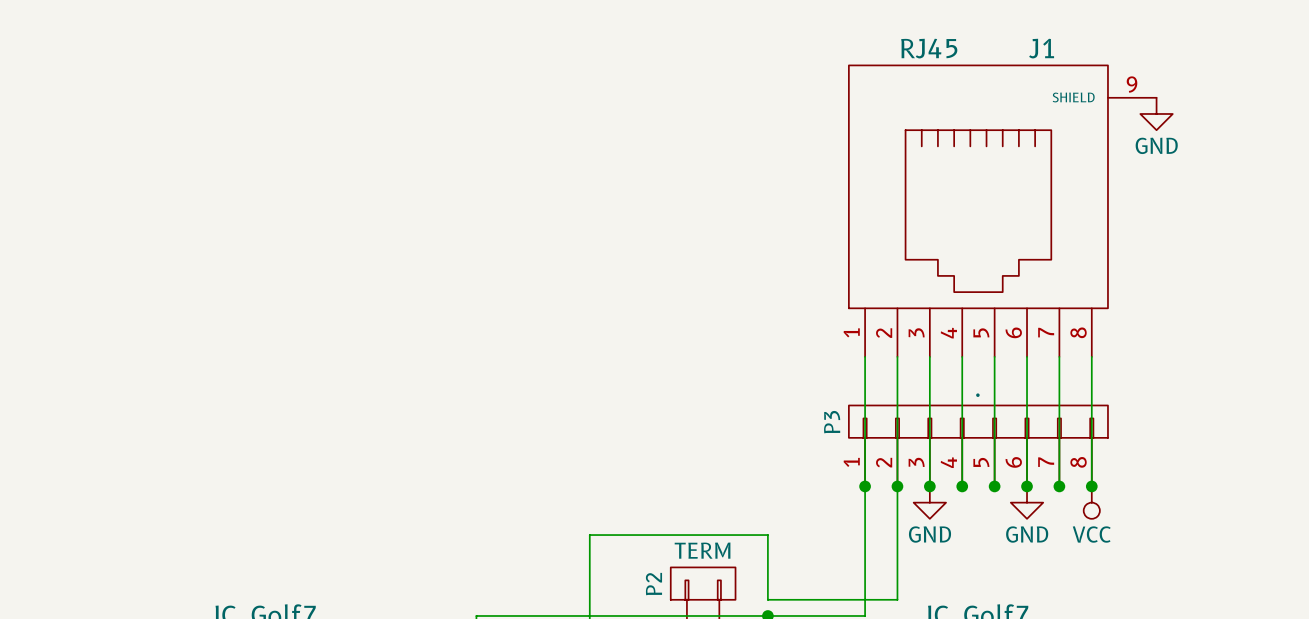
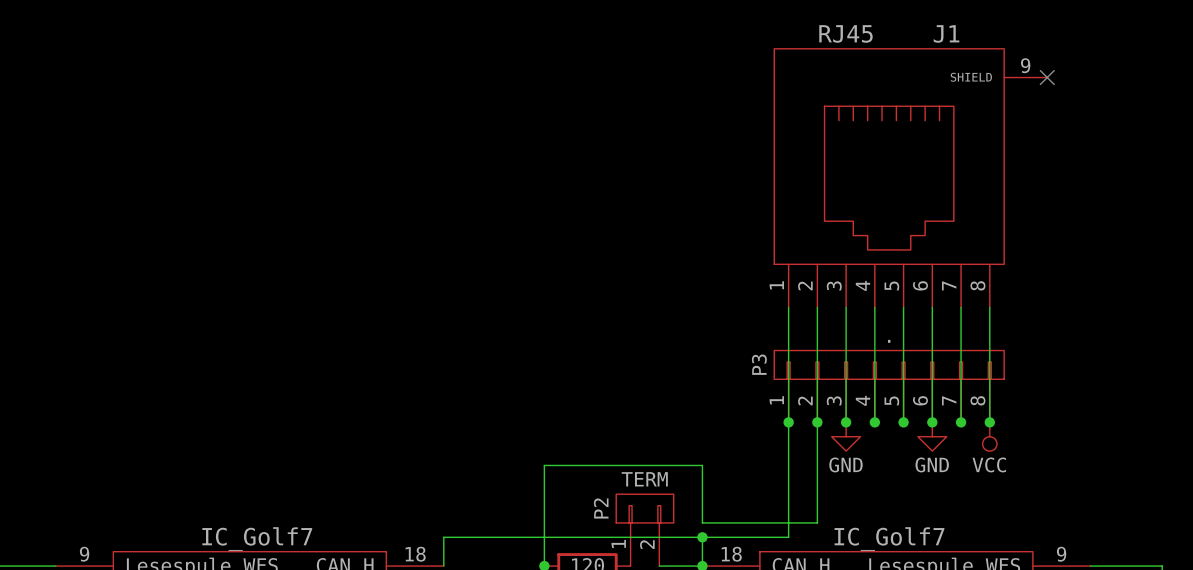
no-connect mark: none -> (1047, 77)
power symbol: GND (1156, 113) -> none

